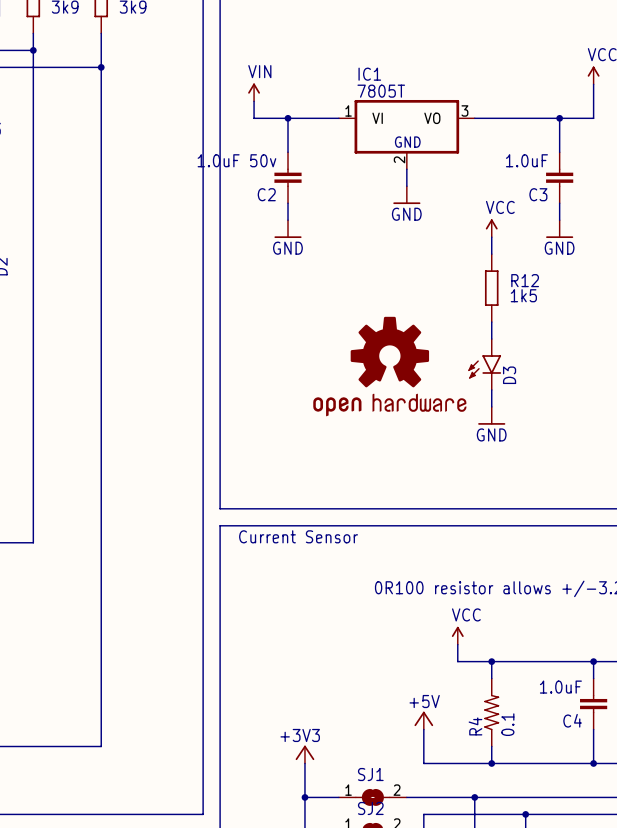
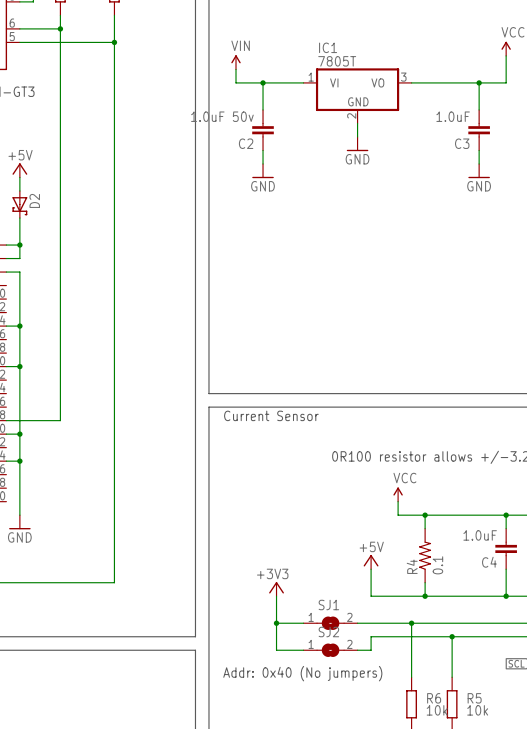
power symbol: VCC (491, 228) -> none
wire: (491, 237) (491, 254) -> none
R12: 1k5 (491, 288) -> none
wire: (491, 322) (491, 339) -> none
D3: (484, 364) -> none
part: (389, 366) -> none
wire: (491, 389) (491, 406) -> none
power symbol: GND (491, 415) -> none

